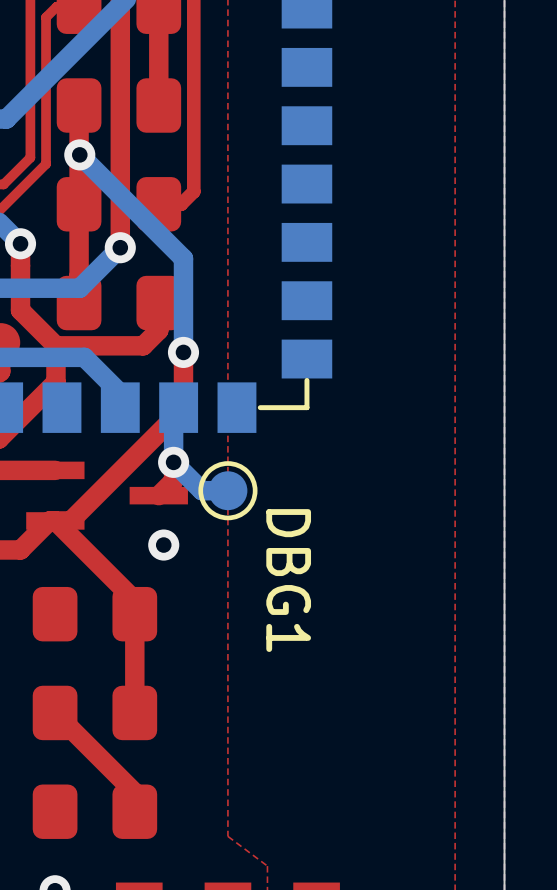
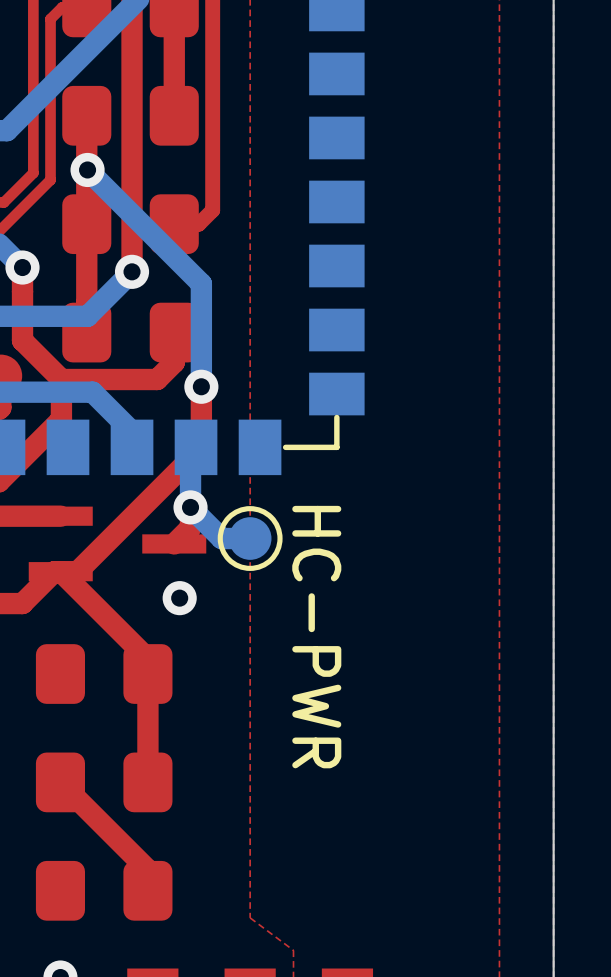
DBG1 name: DBG1 (288, 580) -> HC-PWR (316, 637)

